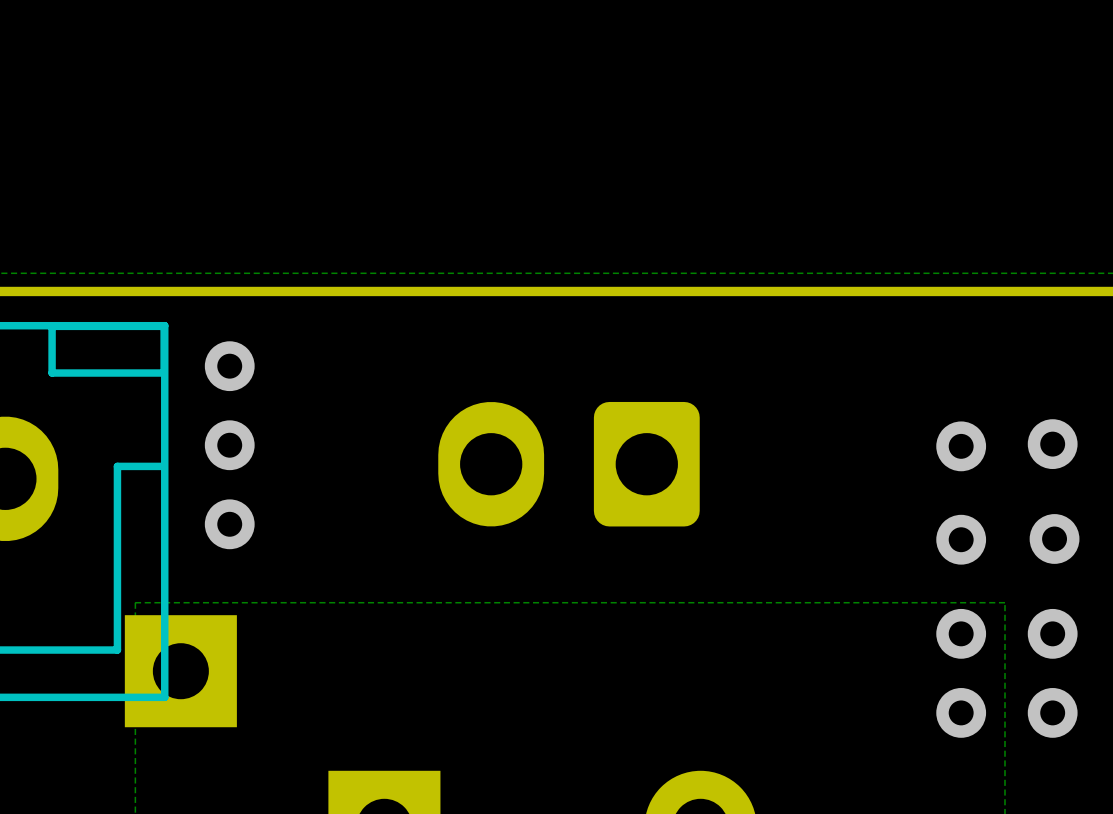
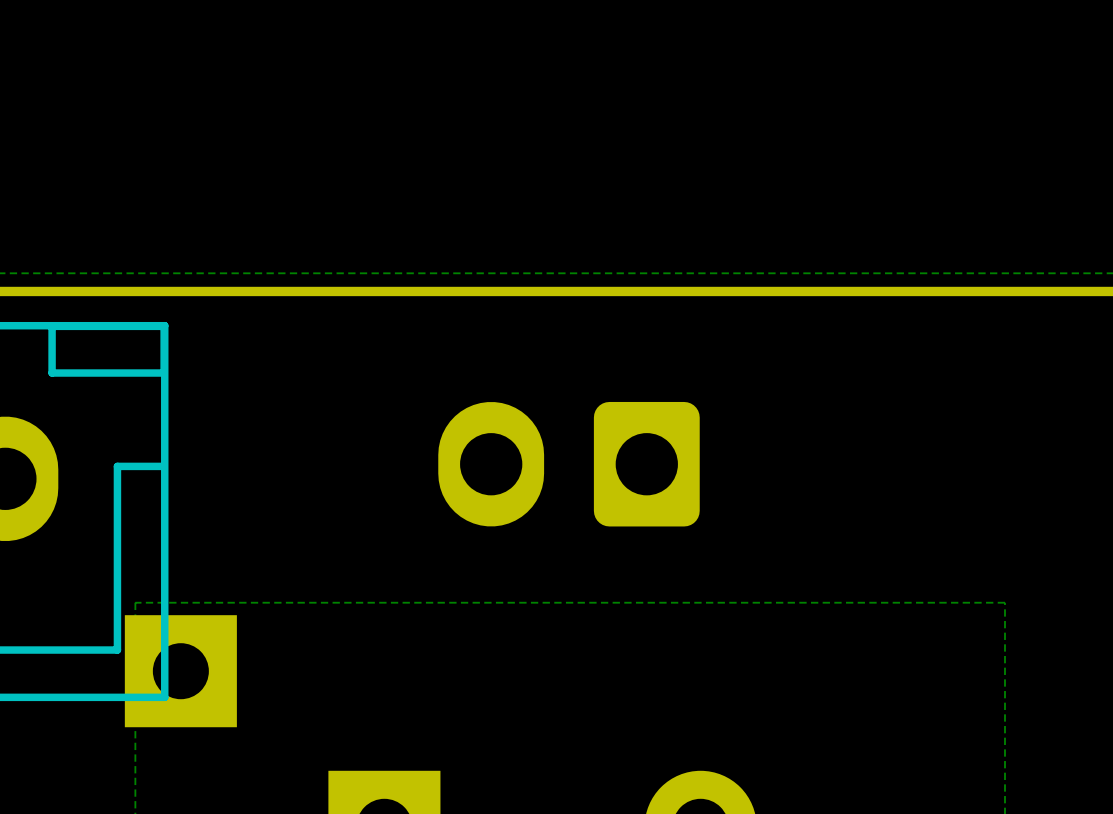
via: (229, 366) -> none
via: (1052, 444) -> none
via: (229, 445) -> none
via: (961, 446) -> none
via: (229, 524) -> none
via: (1054, 538) -> none
via: (961, 539) -> none
via: (961, 633) -> none
via: (1052, 633) -> none
via: (961, 712) -> none
via: (1052, 712) -> none

